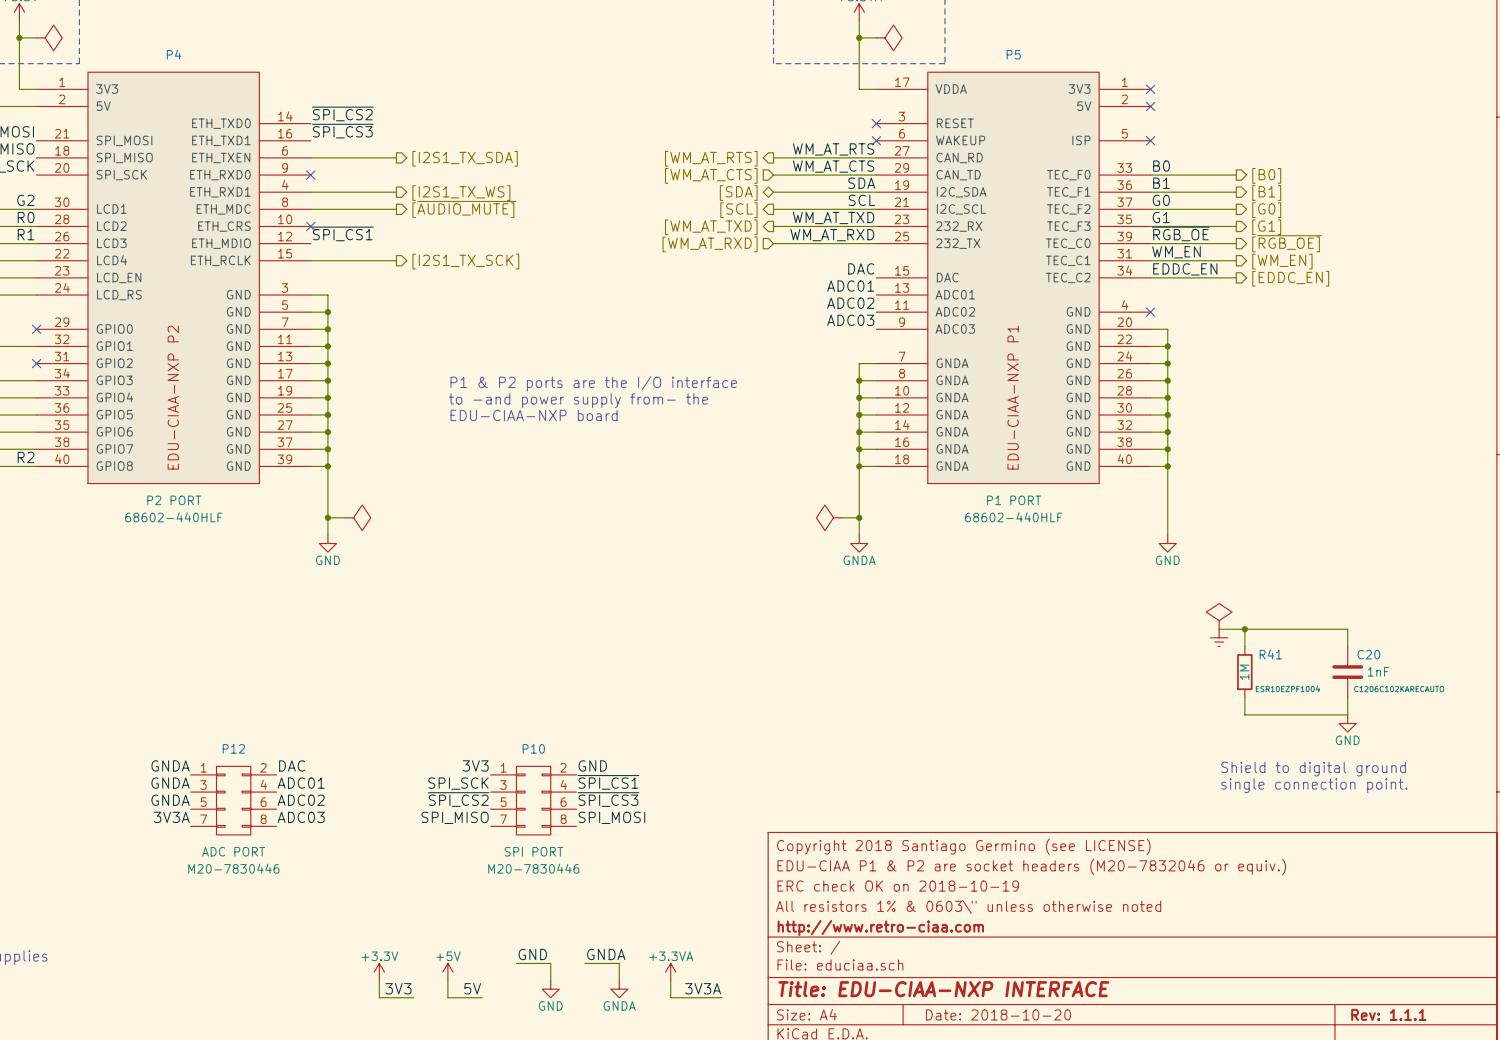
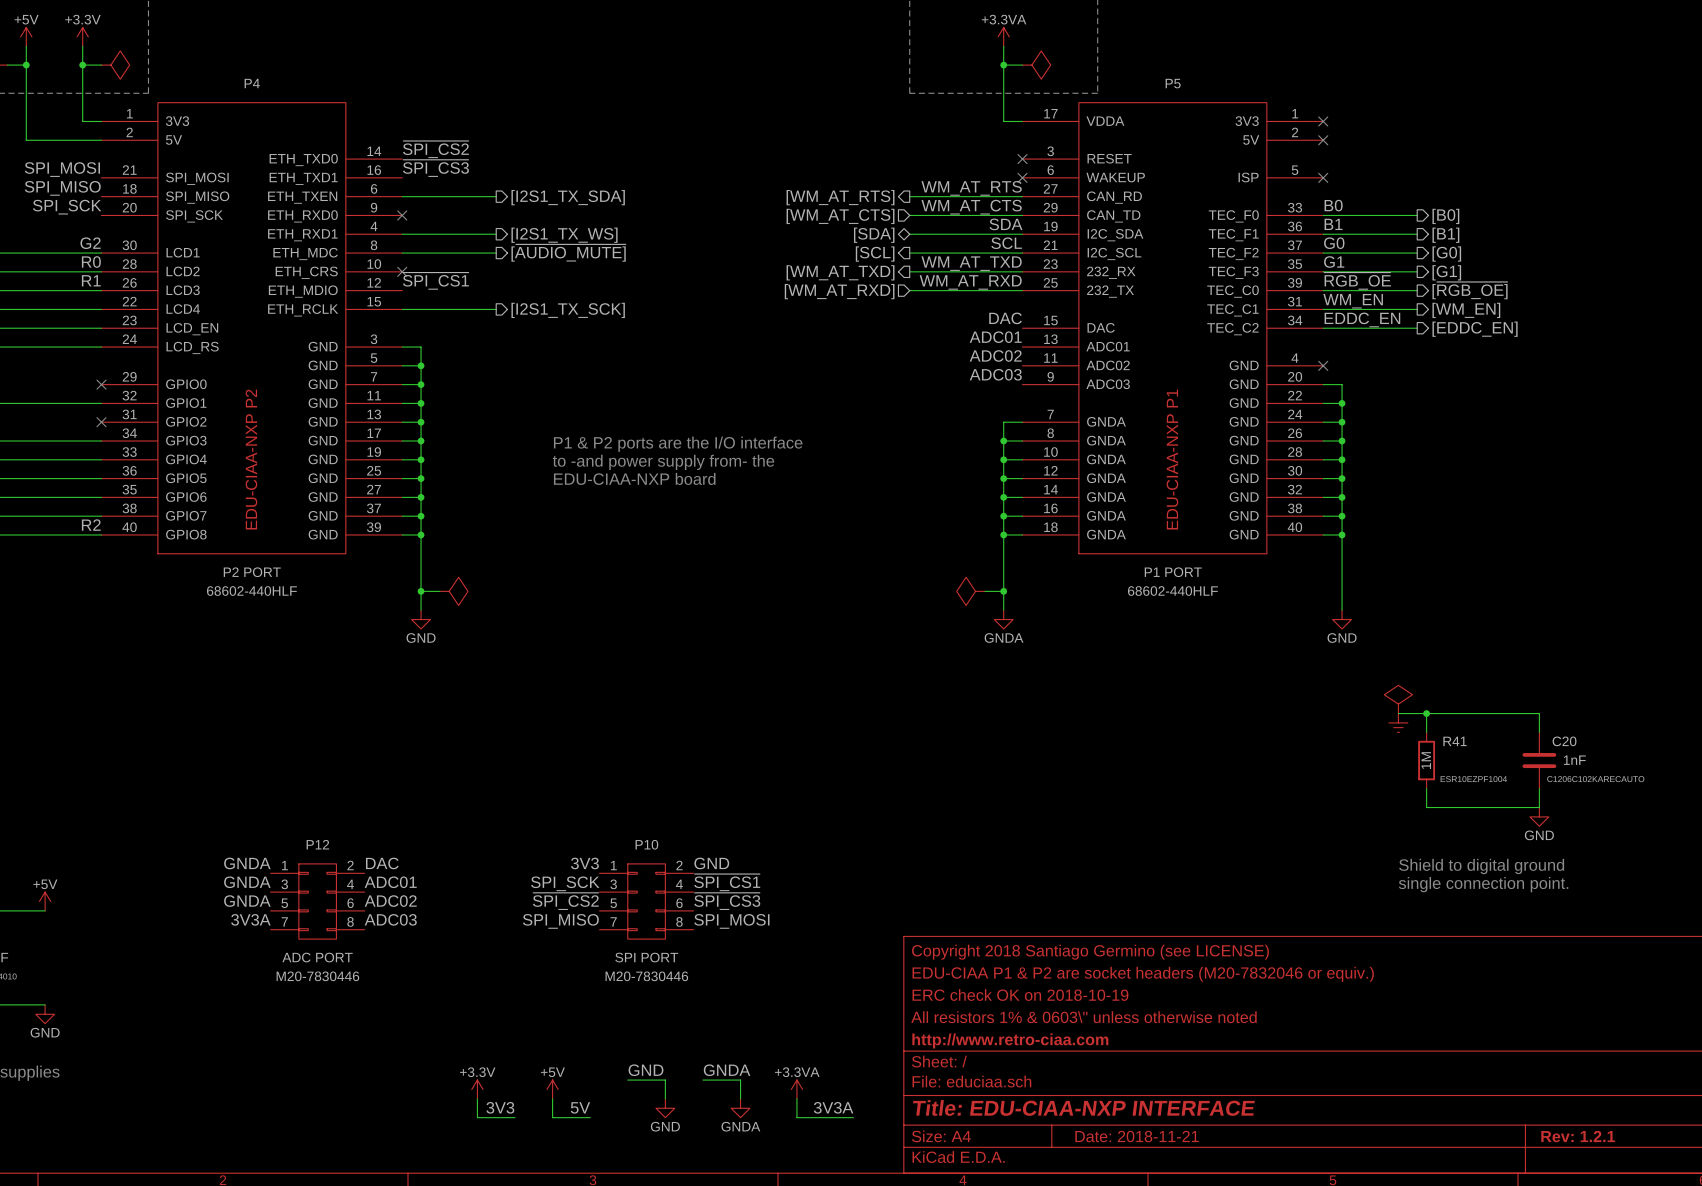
title block: Date: 2018-10-20 (998, 1014) -> Date: 2018-11-21 (1137, 1136)
title block: Rev: 1.1.1 (1388, 1014) -> Rev: 1.2.1 (1578, 1136)

